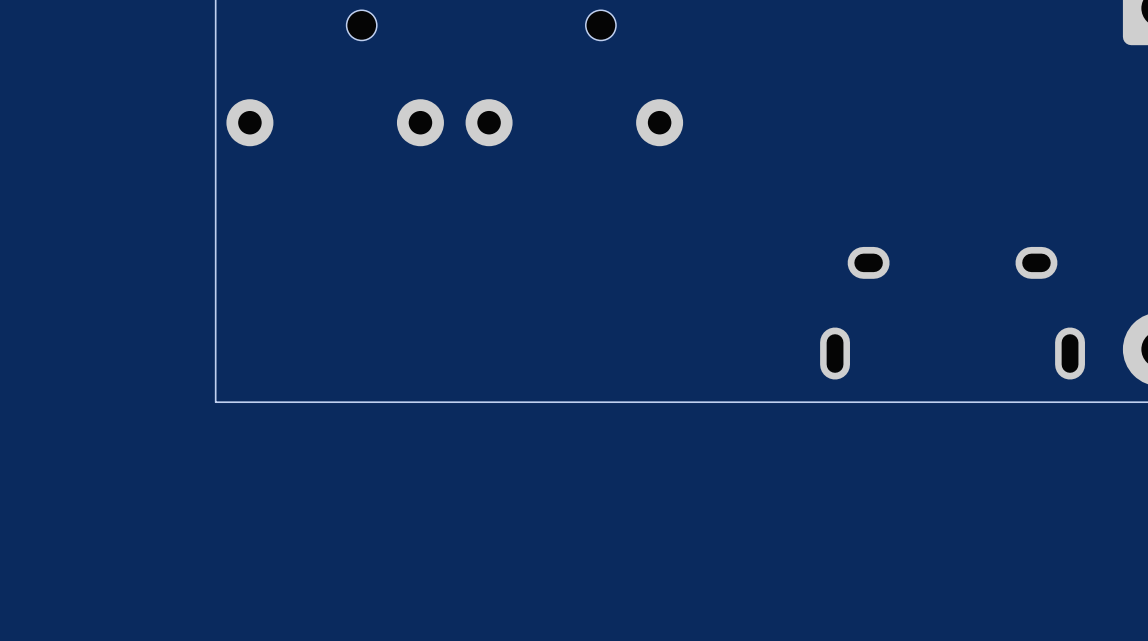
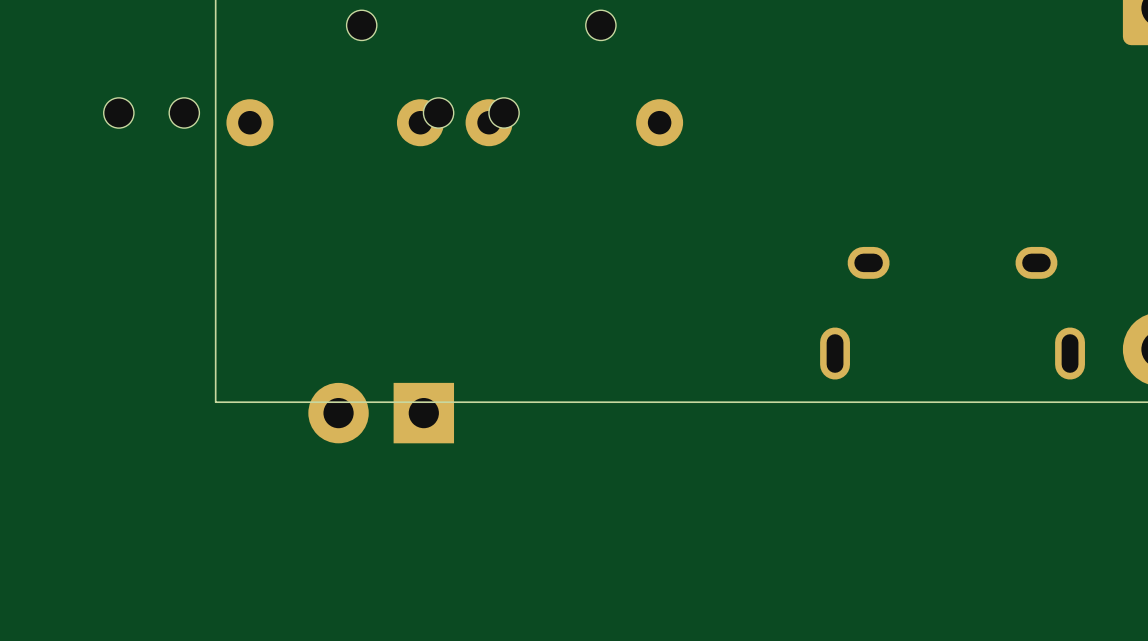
part: none -> (151, 112)
part: none -> (471, 112)
part: none -> (381, 413)

